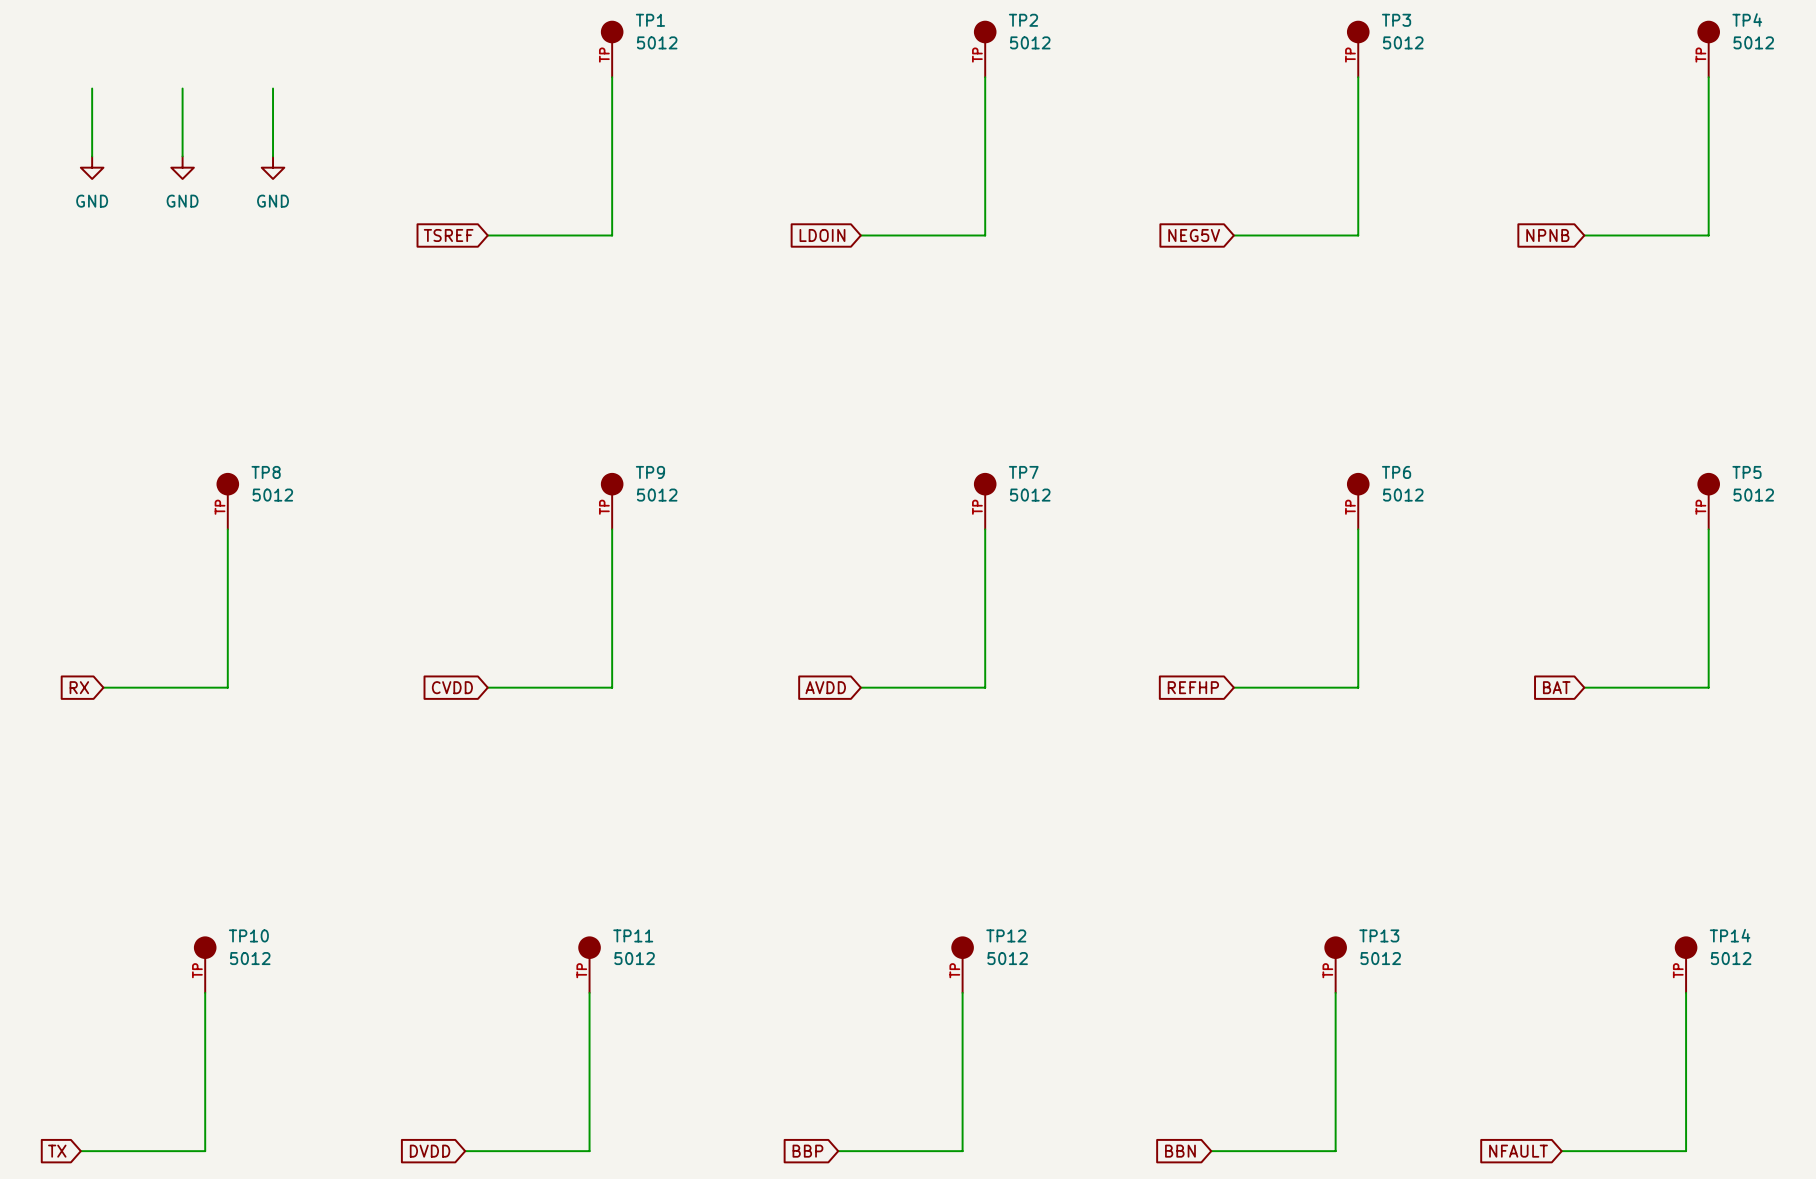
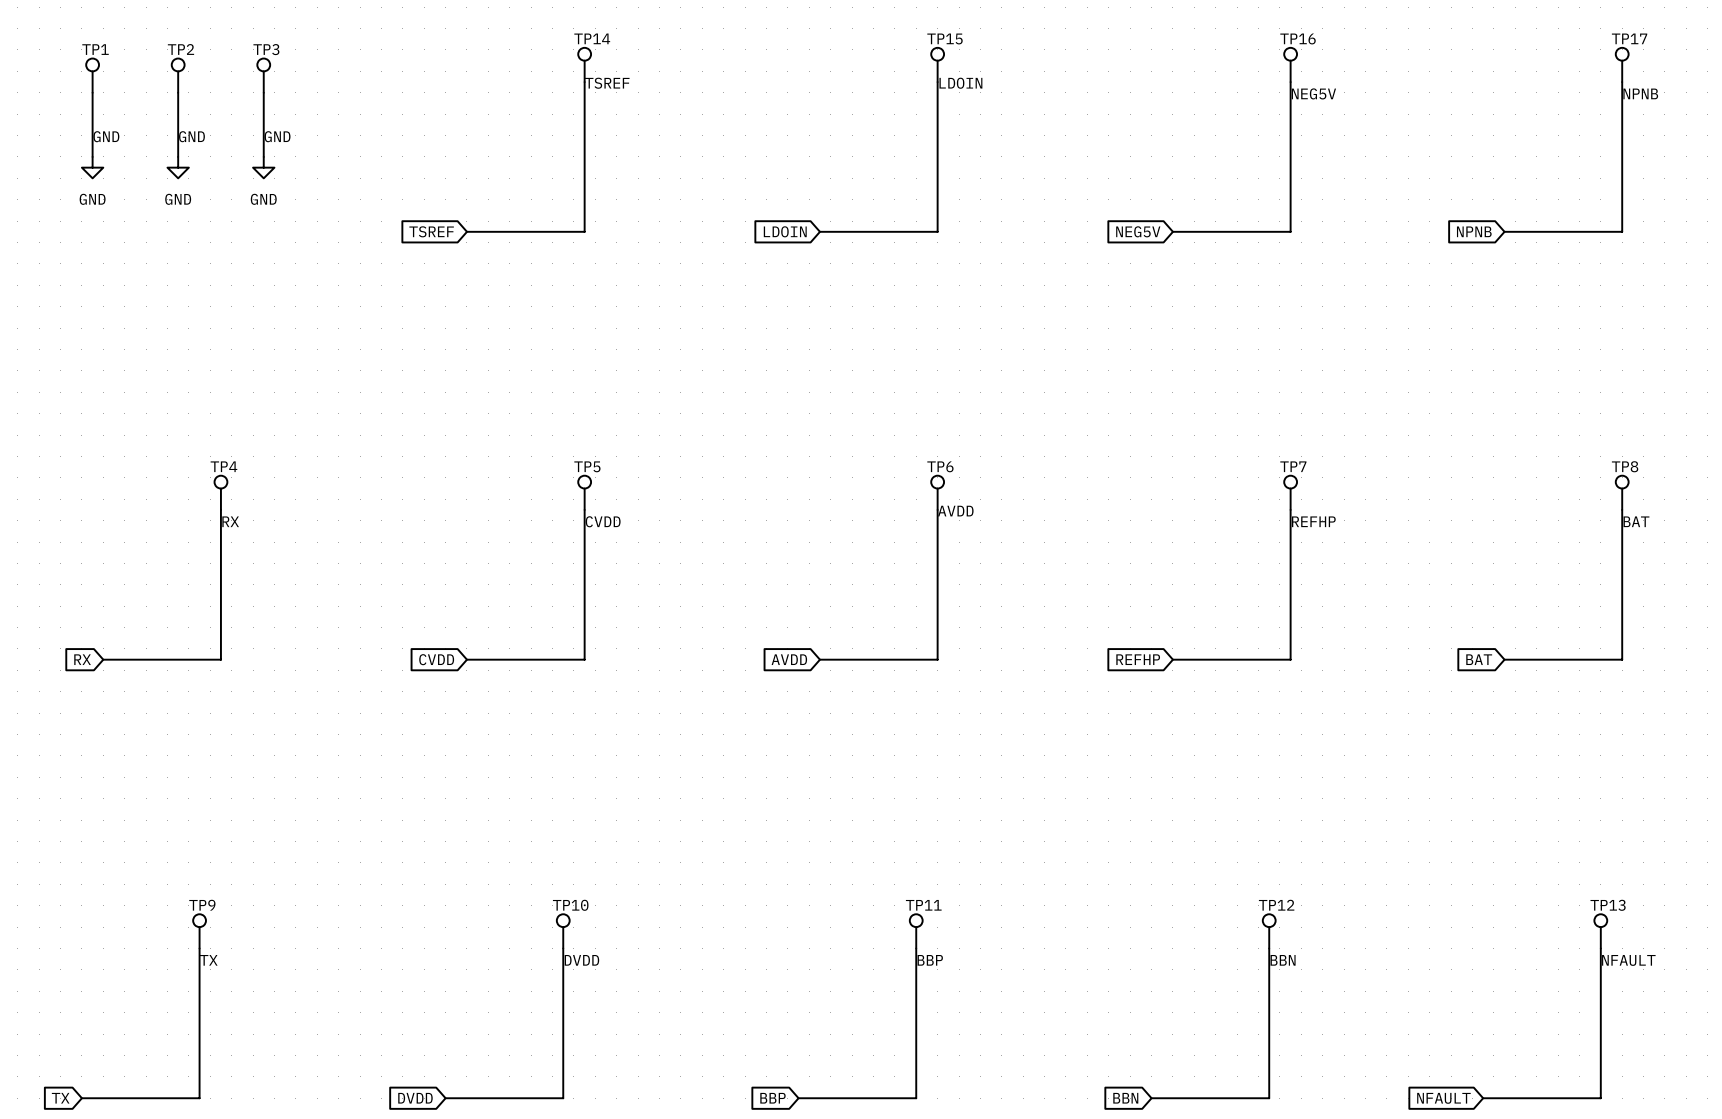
TP1 symbol: [600, 20, 624, 78] -> [86, 58, 100, 93]
TP1 name position: TP1 (650, 20) -> TP1 (95, 49)
TP2 symbol: [973, 20, 997, 78] -> [171, 58, 185, 93]
TP2 name position: TP2 (1023, 20) -> TP2 (180, 49)
TP3 symbol: [1346, 20, 1370, 78] -> [257, 58, 271, 93]
TP3 name position: TP3 (1396, 20) -> TP3 (266, 49)
TP4 symbol: [1697, 20, 1720, 78] -> [214, 475, 228, 510]
TP4 name position: TP4 (1747, 20) -> TP4 (223, 466)
TP1 value: 5012 (657, 42) -> none
TP2 value: 5012 (1030, 42) -> none
TP3 value: 5012 (1403, 42) -> none
TP4 value: 5012 (1753, 42) -> none
TP15: none -> (937, 64)
TP16: none -> (1290, 64)
TP17: none -> (1622, 64)
label: none -> TSREF (607, 83)
label: none -> LDOIN (960, 83)
label: none -> NEG5V (1313, 93)
label: none -> NPNB (1640, 93)
label: none -> GND (106, 136)
label: none -> GND (191, 136)
label: none -> GND (277, 136)
TP8 symbol: [216, 472, 240, 530] -> [1615, 475, 1629, 510]
TP8 name position: TP8 (266, 472) -> TP8 (1625, 466)
TP9 symbol: [600, 472, 624, 530] -> [193, 914, 206, 949]
TP9 name position: TP9 (650, 472) -> TP9 (202, 905)
TP7 symbol: [973, 472, 997, 530] -> [1284, 475, 1298, 510]
TP7 name position: TP7 (1023, 472) -> TP7 (1293, 466)
TP6 symbol: [1346, 472, 1370, 530] -> [931, 475, 945, 510]
TP6 name position: TP6 (1396, 472) -> TP6 (940, 466)
TP5 symbol: [1697, 472, 1720, 530] -> [578, 475, 592, 510]
TP5 name position: TP5 (1746, 472) -> TP5 (587, 466)
TP8 value: 5012 (272, 495) -> none
TP9 value: 5012 (657, 495) -> none
TP7 value: 5012 (1030, 495) -> none
TP6 value: 5012 (1403, 495) -> none
TP5 value: 5012 (1753, 495) -> none
label: none -> AVDD (955, 511)
label: none -> RX (230, 521)
label: none -> CVDD (603, 521)
label: none -> REFHP (1313, 521)
label: none -> BAT (1636, 521)
TP10 name position: TP10 (248, 935) -> TP10 (570, 905)
TP11 name position: TP11 (633, 935) -> TP11 (923, 905)
TP12 name position: TP12 (1006, 935) -> TP12 (1276, 905)
TP13 name position: TP13 (1379, 935) -> TP13 (1608, 905)
TP14 name position: TP14 (1730, 935) -> TP14 (592, 38)
TP10 symbol: [193, 936, 217, 993] -> [556, 914, 570, 949]
TP11 symbol: [578, 936, 601, 993] -> [909, 914, 923, 949]
TP12 symbol: [951, 936, 974, 993] -> [1262, 914, 1276, 949]
TP13 symbol: [1324, 936, 1347, 993] -> [1594, 914, 1608, 949]
TP14 symbol: [1674, 936, 1698, 993] -> [578, 47, 592, 83]
TP10 value: 5012 (250, 958) -> none
TP11 value: 5012 (634, 958) -> none
TP12 value: 5012 (1007, 958) -> none
TP13 value: 5012 (1380, 958) -> none
TP14 value: 5012 (1731, 958) -> none
label: none -> TX (208, 960)
label: none -> DVDD (581, 960)
label: none -> BBP (930, 960)
label: none -> BBN (1283, 960)
label: none -> NFAULT (1628, 960)

